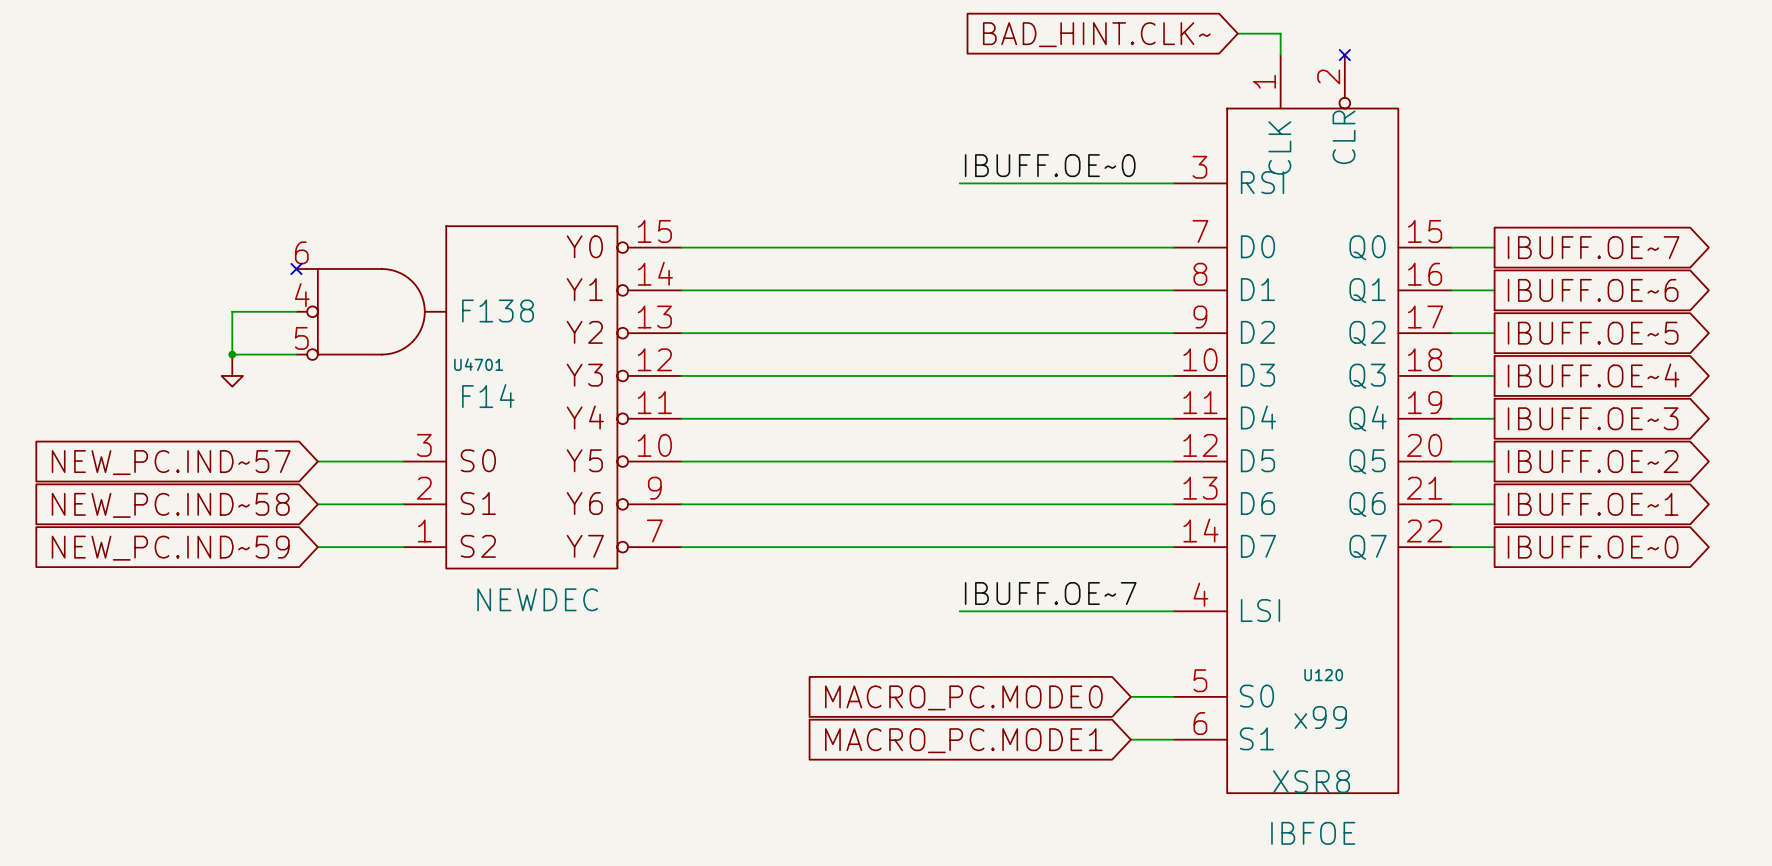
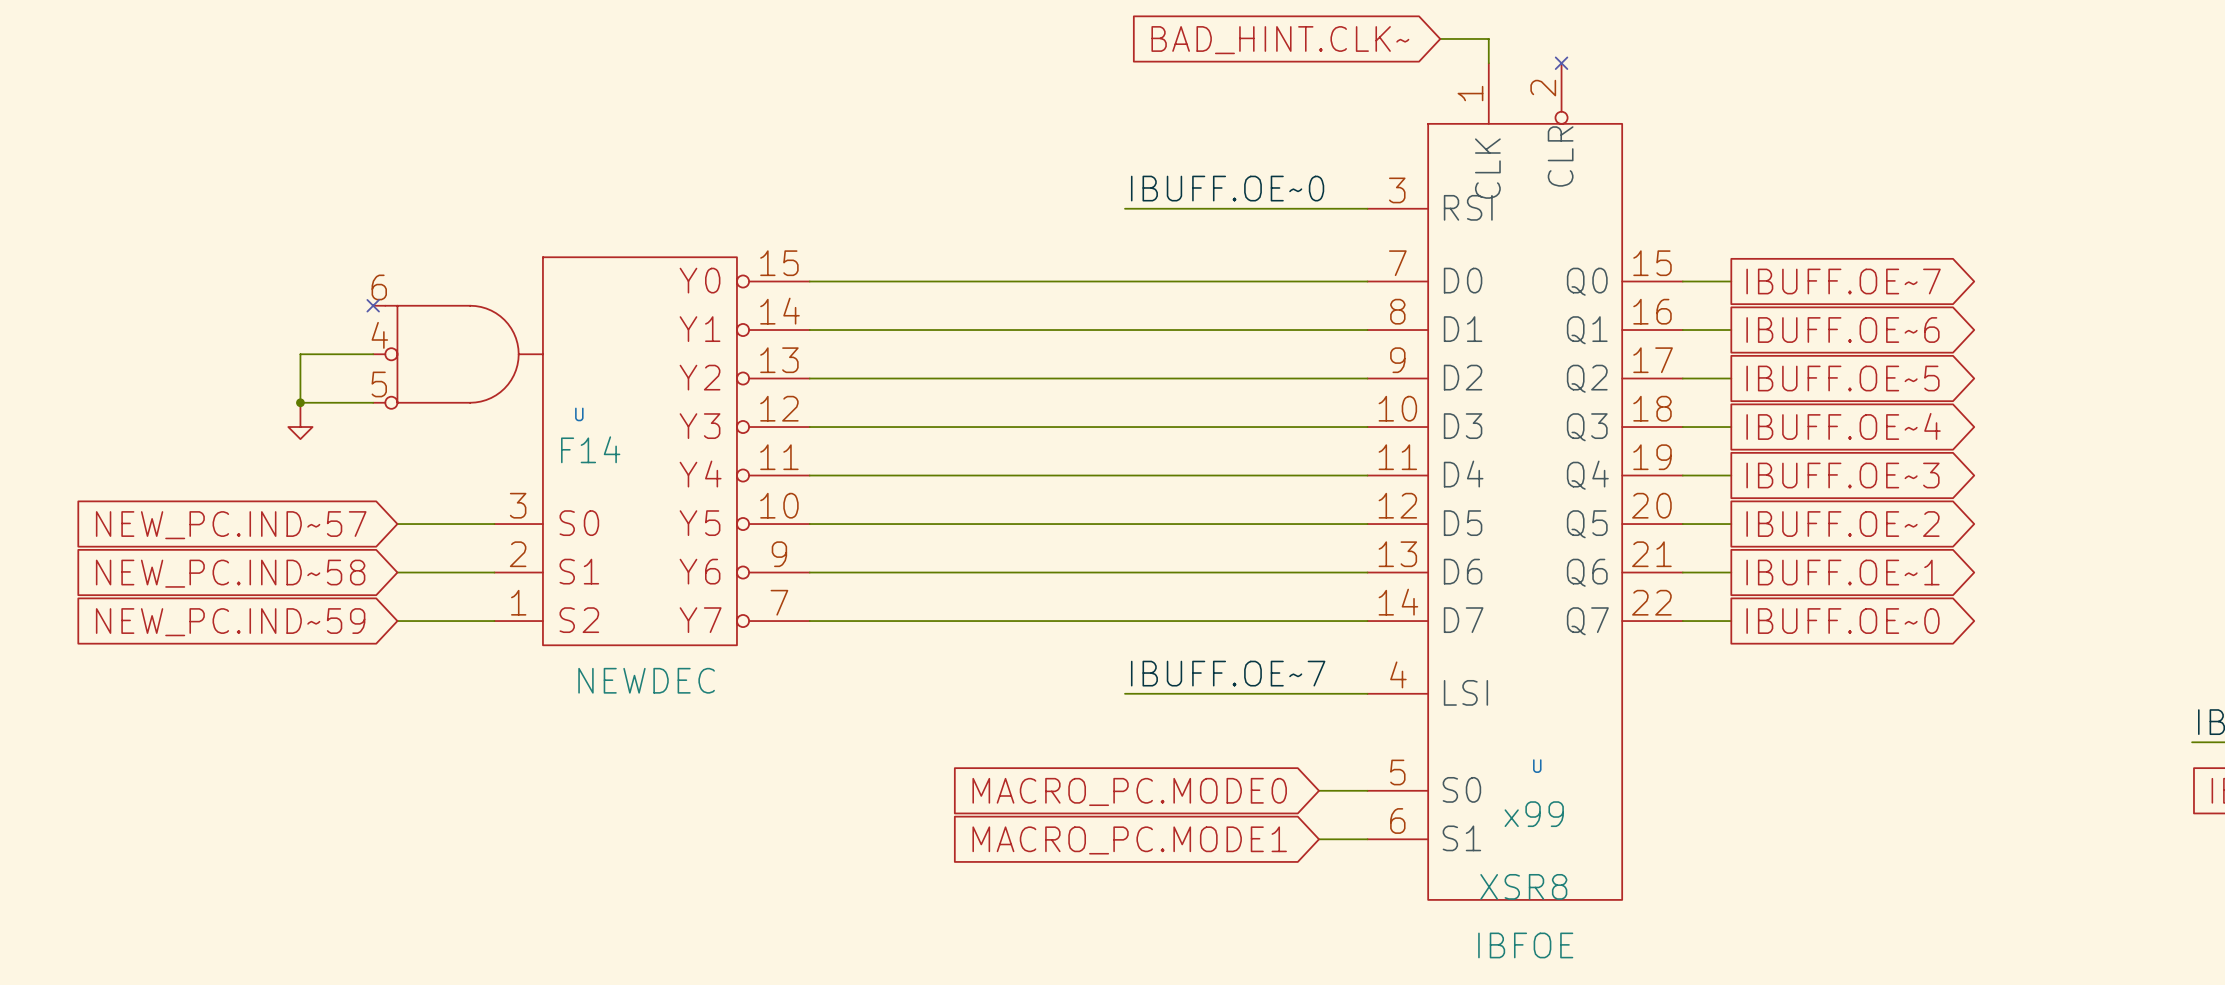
U4701 value: F138 (498, 310) -> none
U4701 name: U4701 (478, 364) -> U (579, 414)
U120 name: U120 (1323, 675) -> U (1537, 766)

